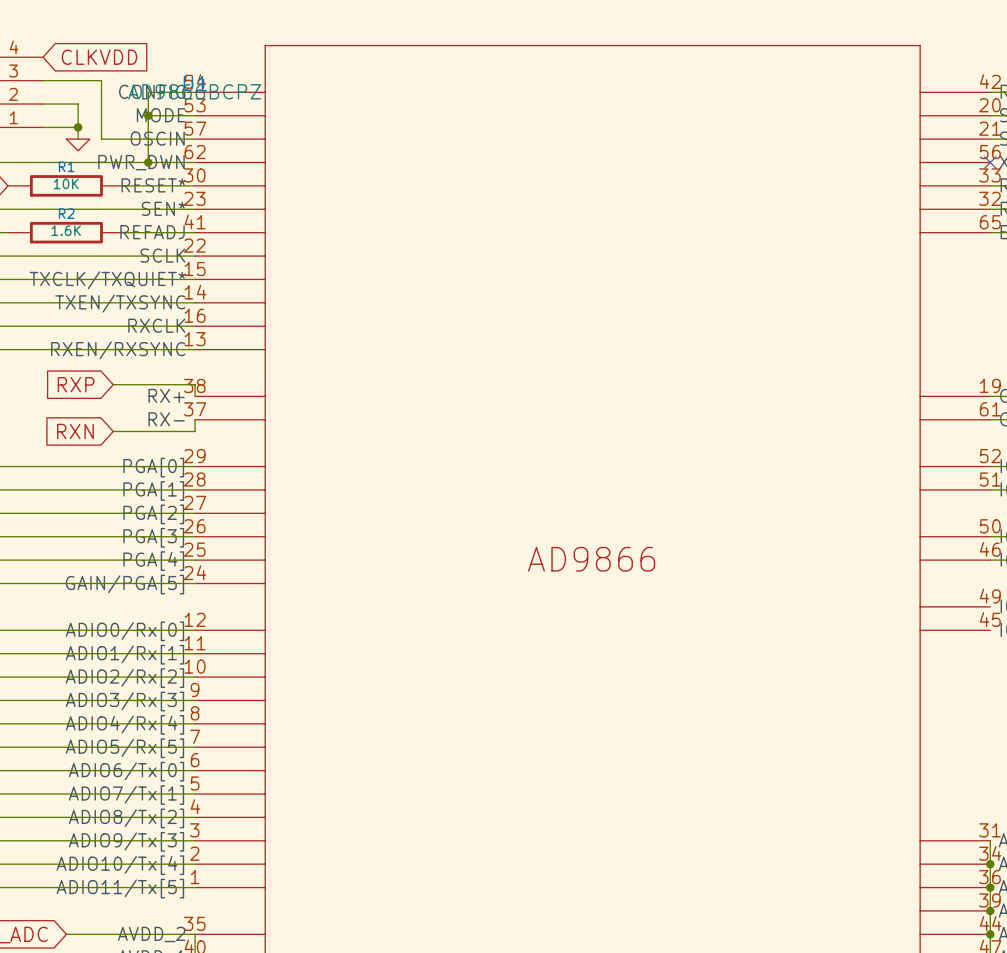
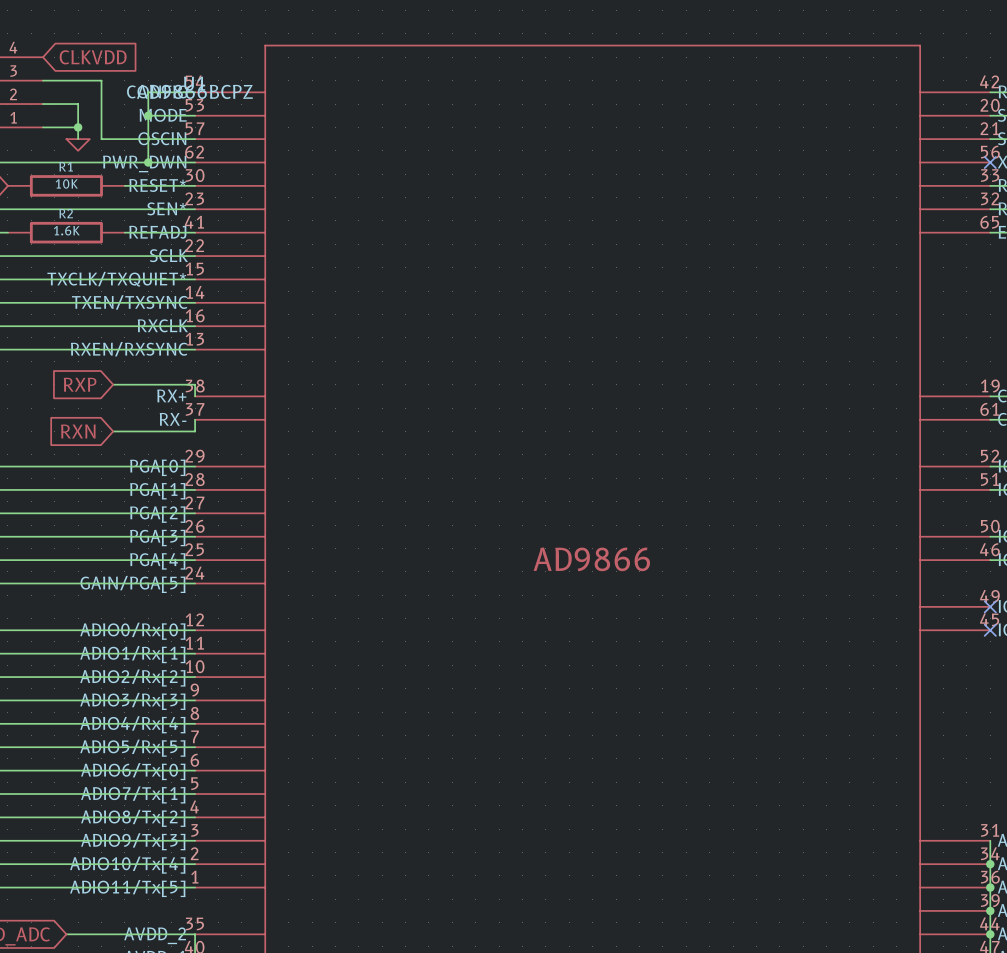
no-connect mark: none -> (990, 606)
no-connect mark: none -> (990, 630)

